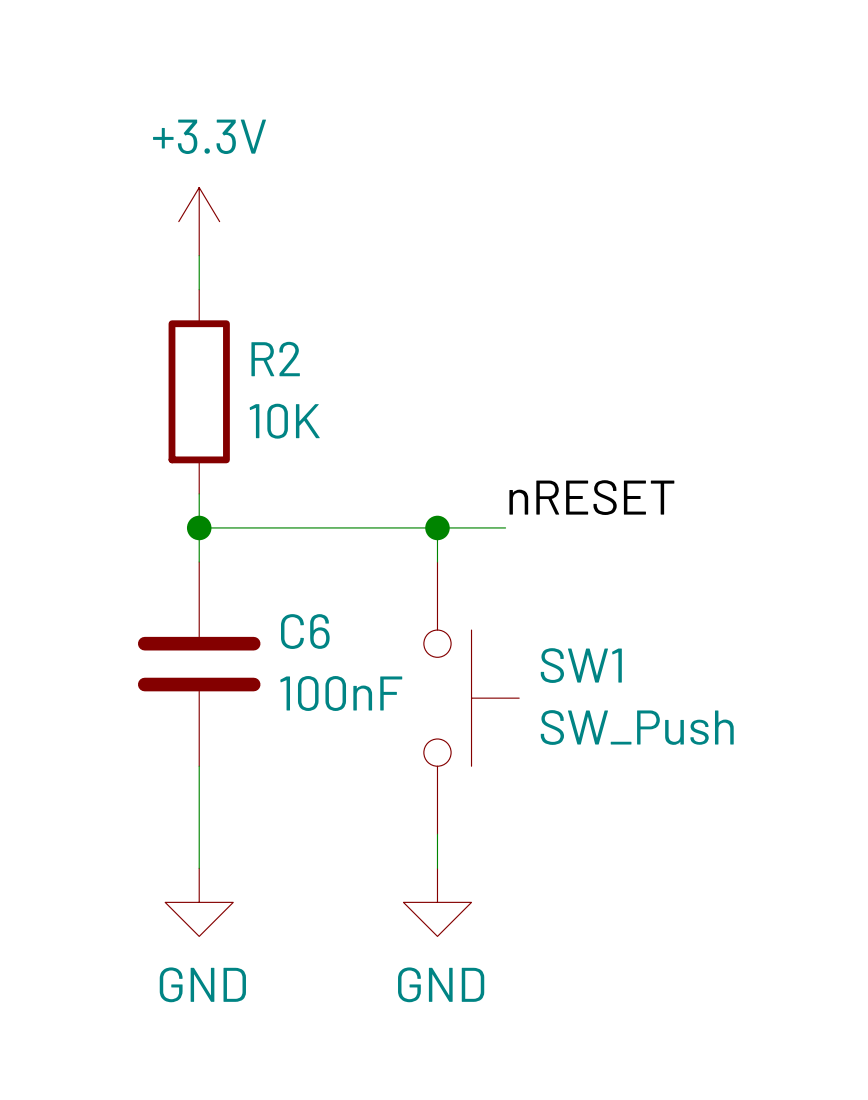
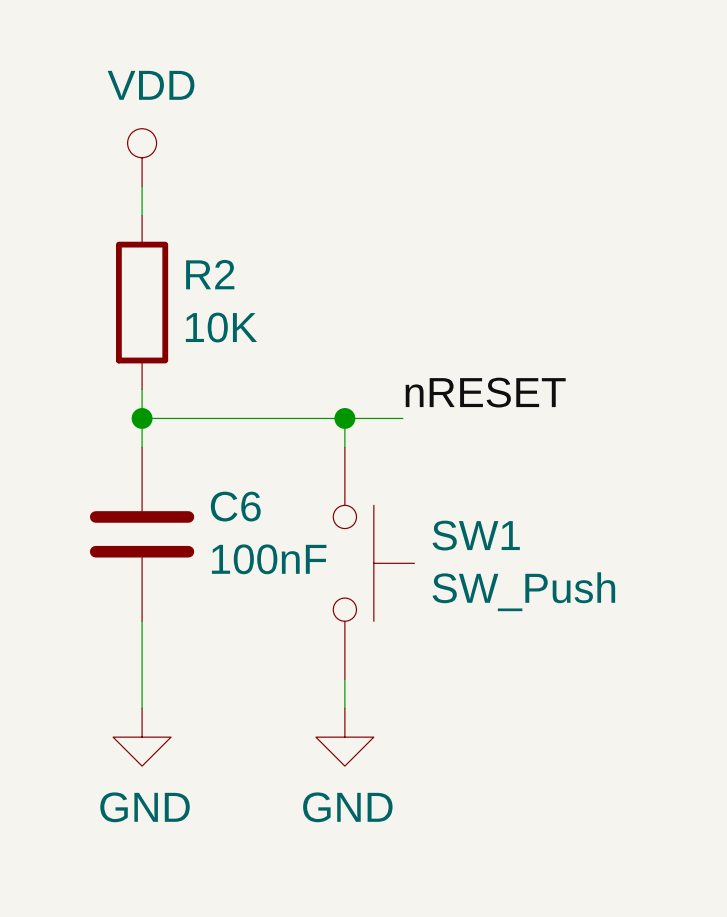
power symbol: +3.3V (199, 221) -> VDD (142, 157)

